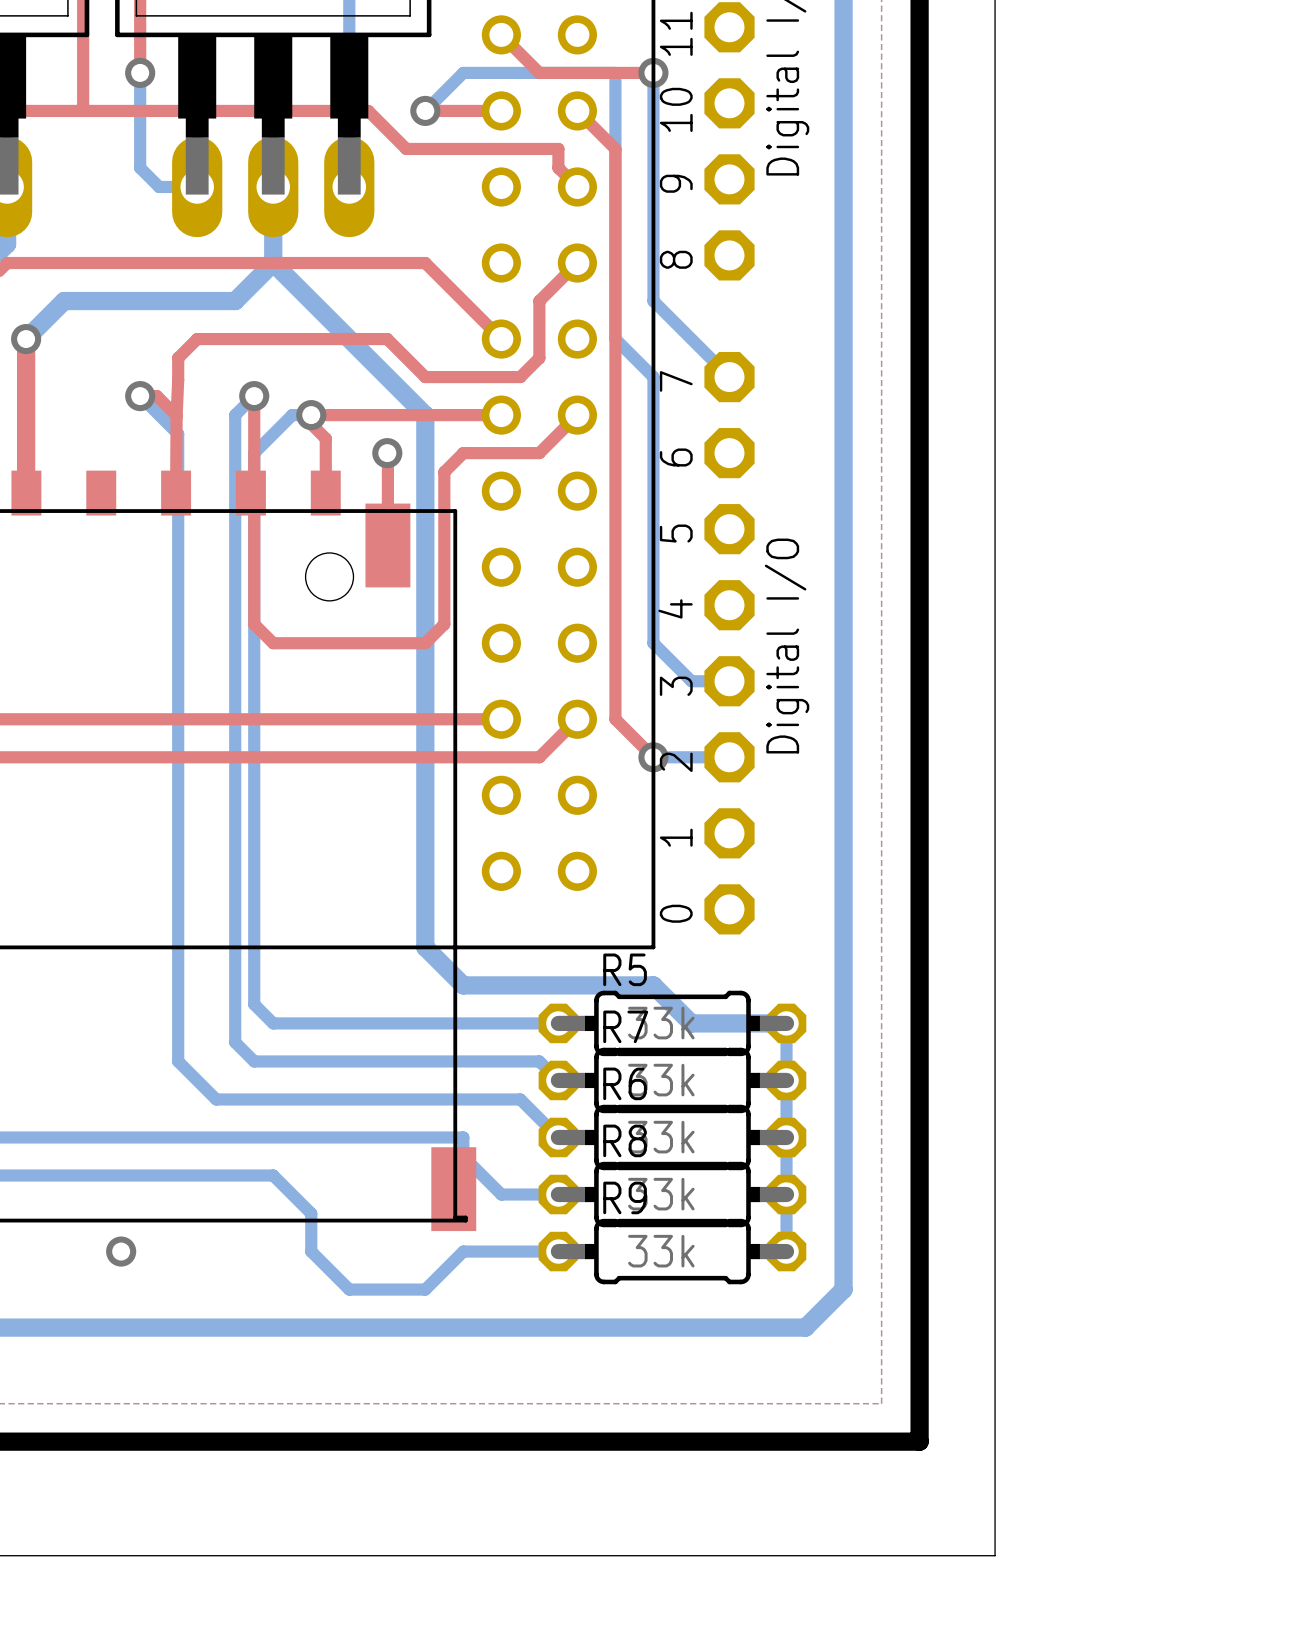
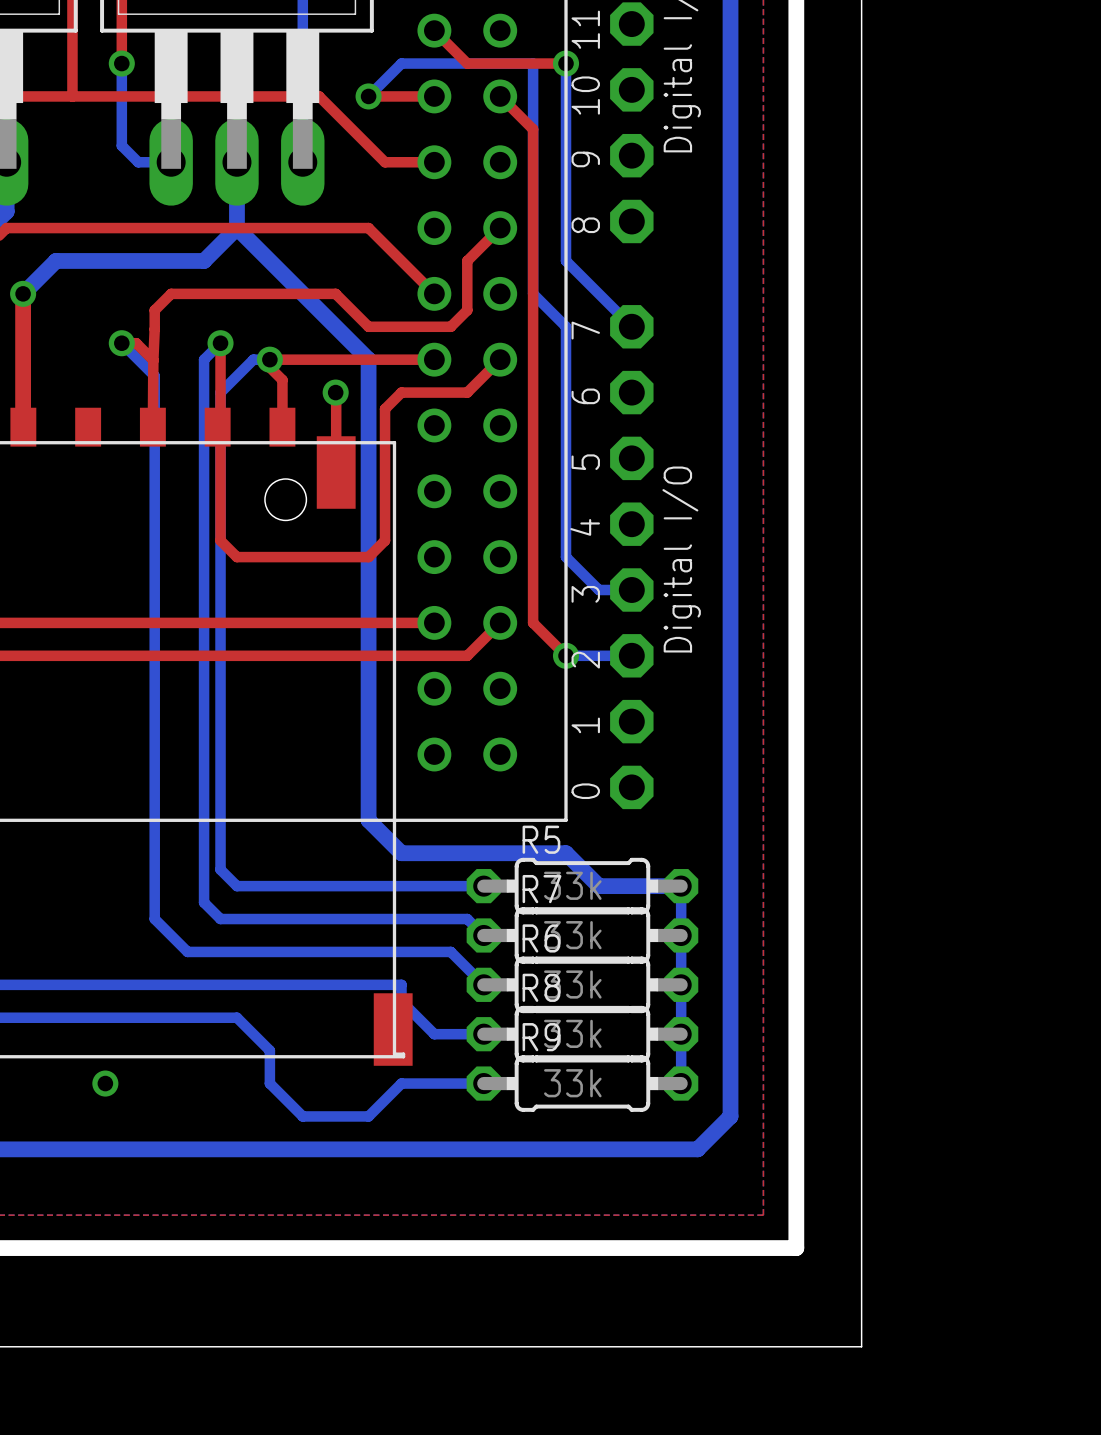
top track: (406, 148) (558, 148) (558, 167) (577, 186) -> (352, 129) (385, 162) (434, 162)

